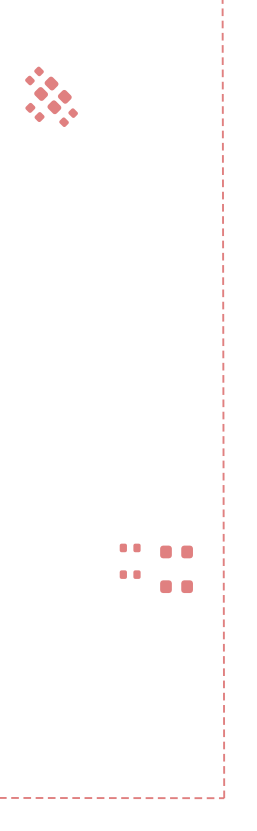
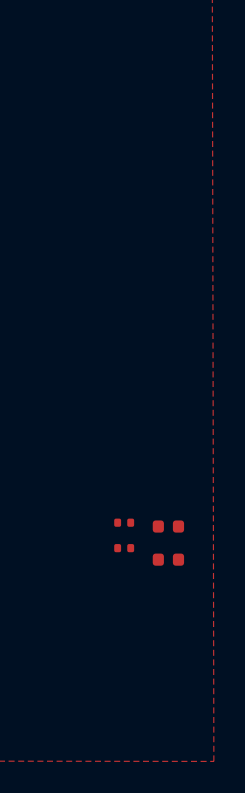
part: (34, 75) -> none
part: (52, 95) -> none
part: (34, 112) -> none
part: (68, 117) -> none

